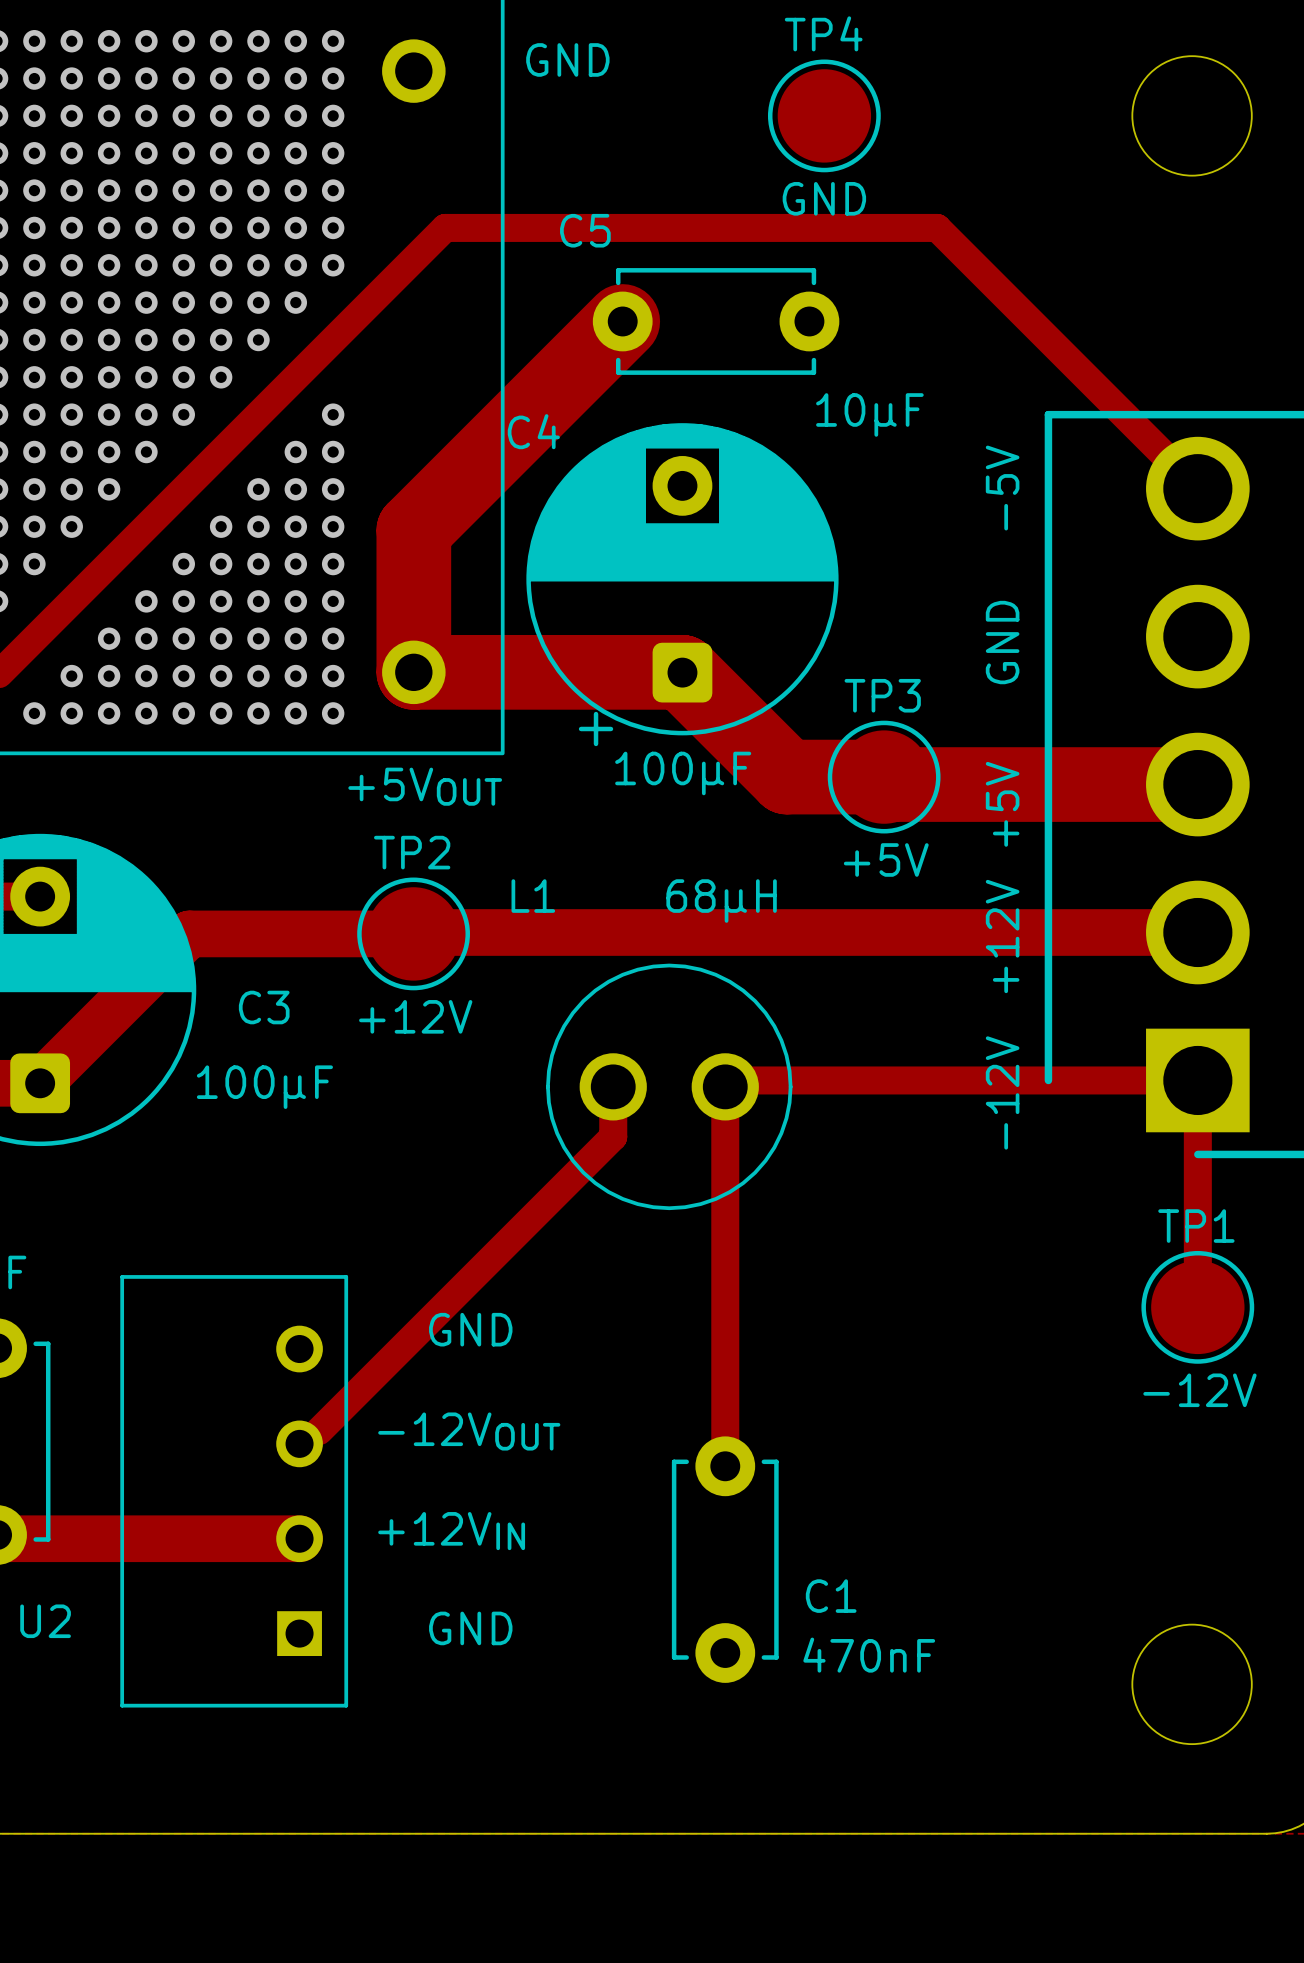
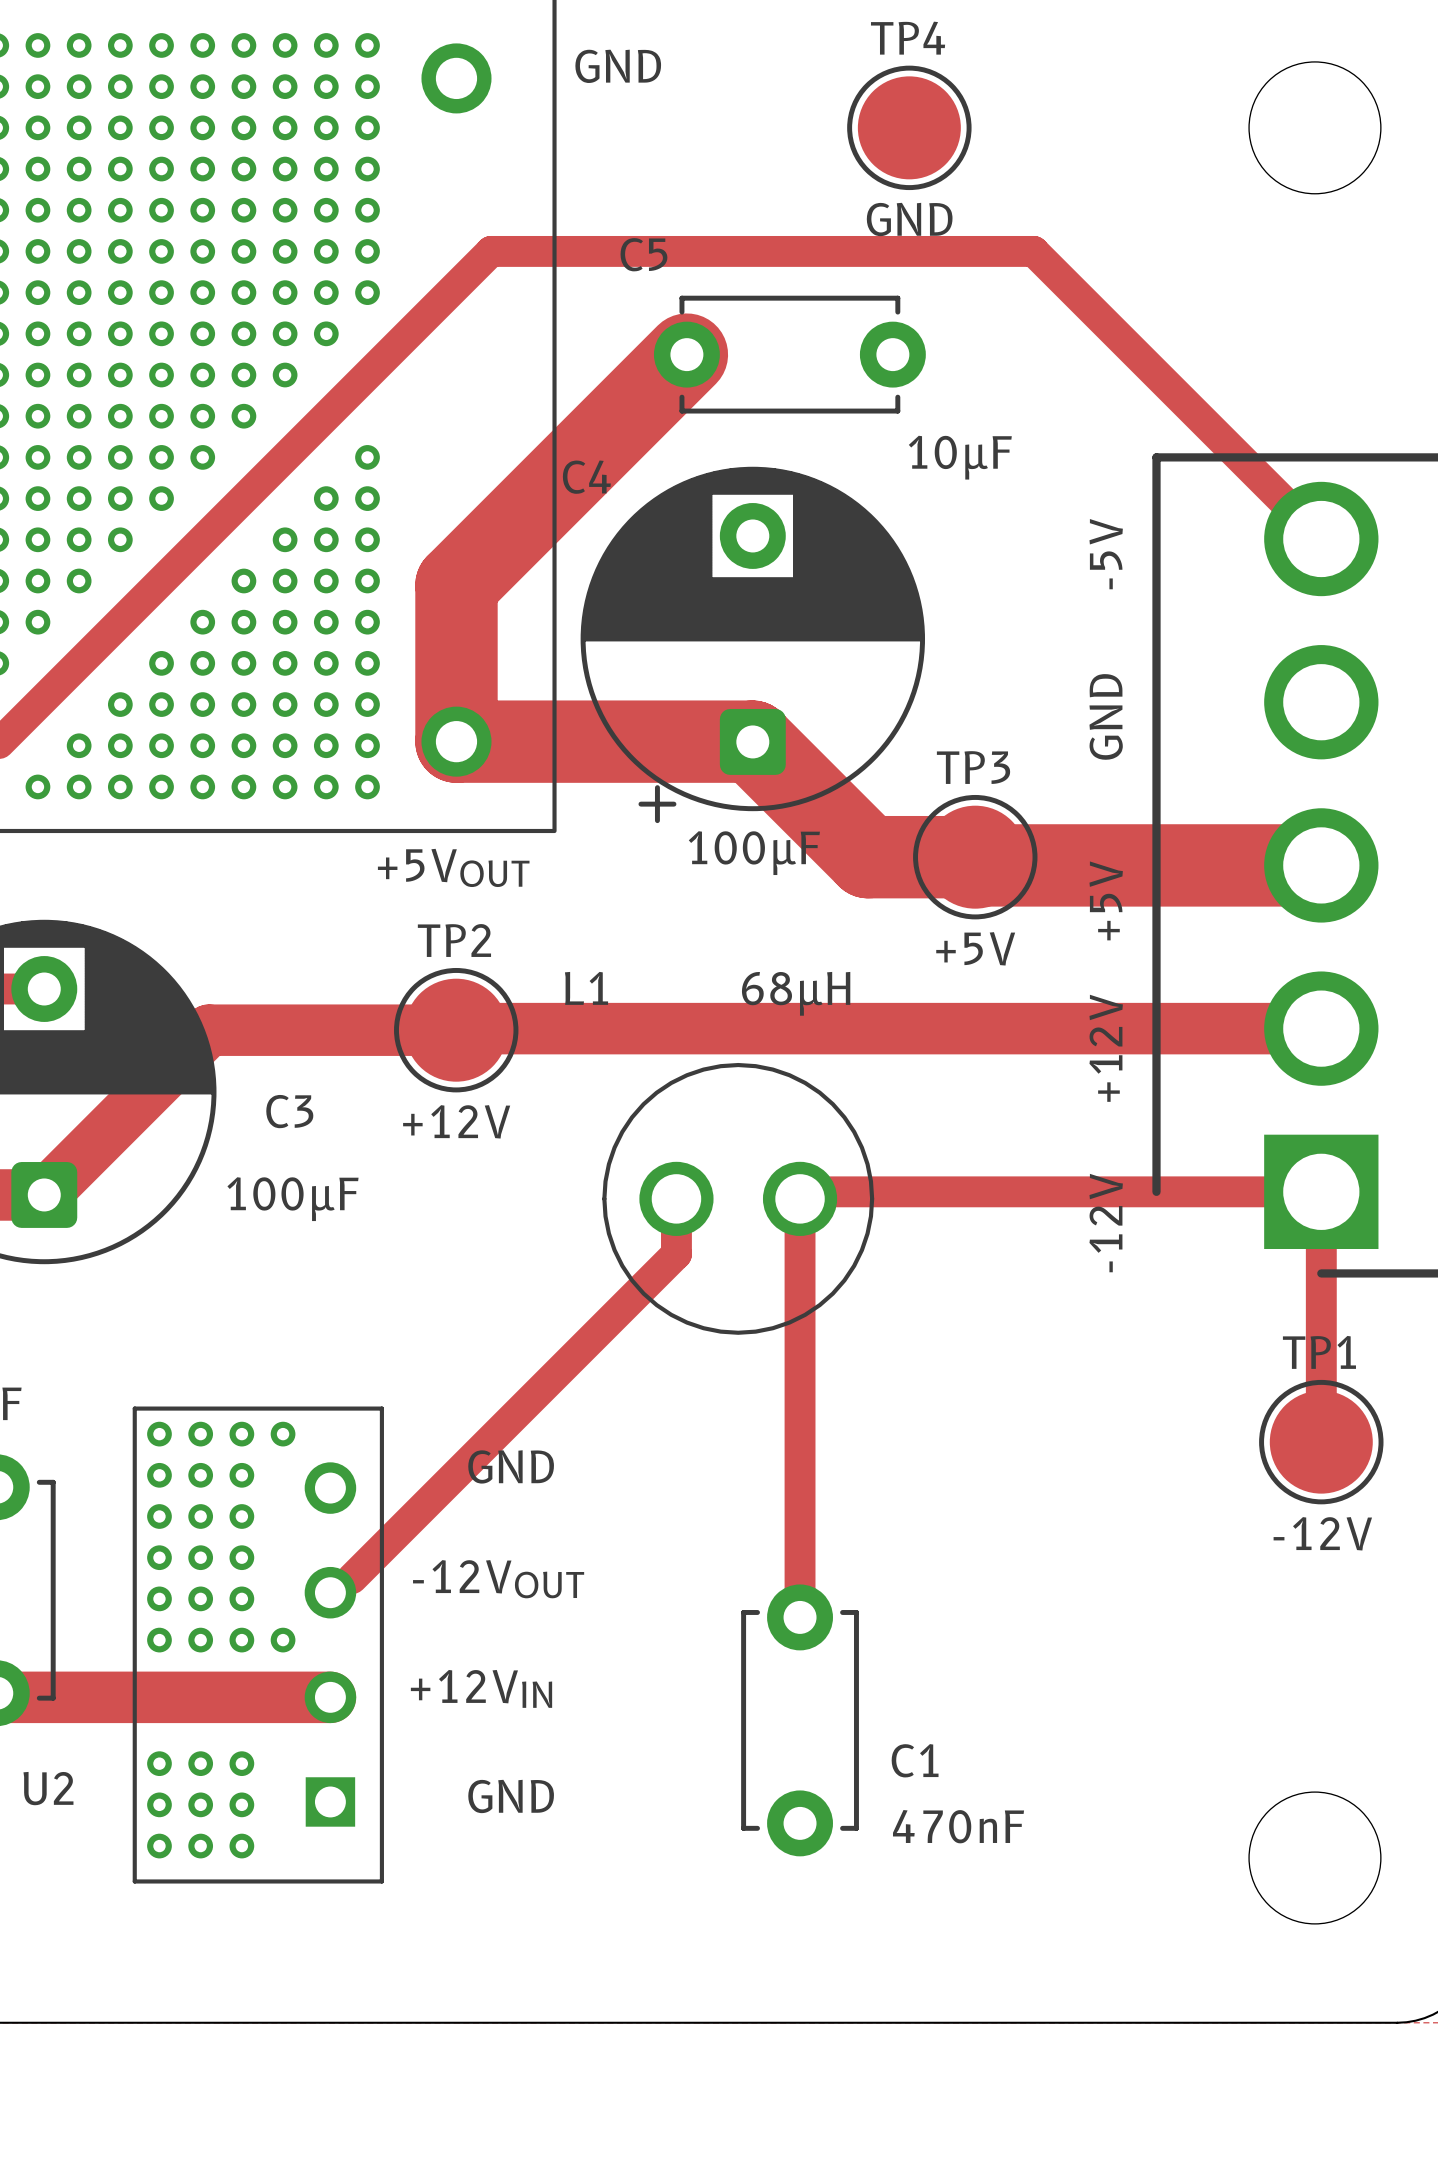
via: none -> (159, 1434)
via: none -> (200, 1434)
via: none -> (241, 1434)
via: none -> (283, 1434)
via: none -> (159, 1475)
via: none -> (200, 1475)
via: none -> (241, 1475)
via: none -> (159, 1516)
via: none -> (200, 1516)
via: none -> (241, 1516)
via: none -> (159, 1557)
via: none -> (200, 1557)
via: none -> (241, 1557)
via: none -> (159, 1598)
via: none -> (200, 1598)
via: none -> (241, 1598)
via: none -> (159, 1640)
via: none -> (200, 1640)
via: none -> (241, 1640)
via: none -> (283, 1640)
via: none -> (159, 1763)
via: none -> (200, 1763)
via: none -> (241, 1763)
via: none -> (159, 1804)
via: none -> (200, 1804)
via: none -> (241, 1804)
via: none -> (159, 1846)
via: none -> (200, 1846)
via: none -> (241, 1846)

